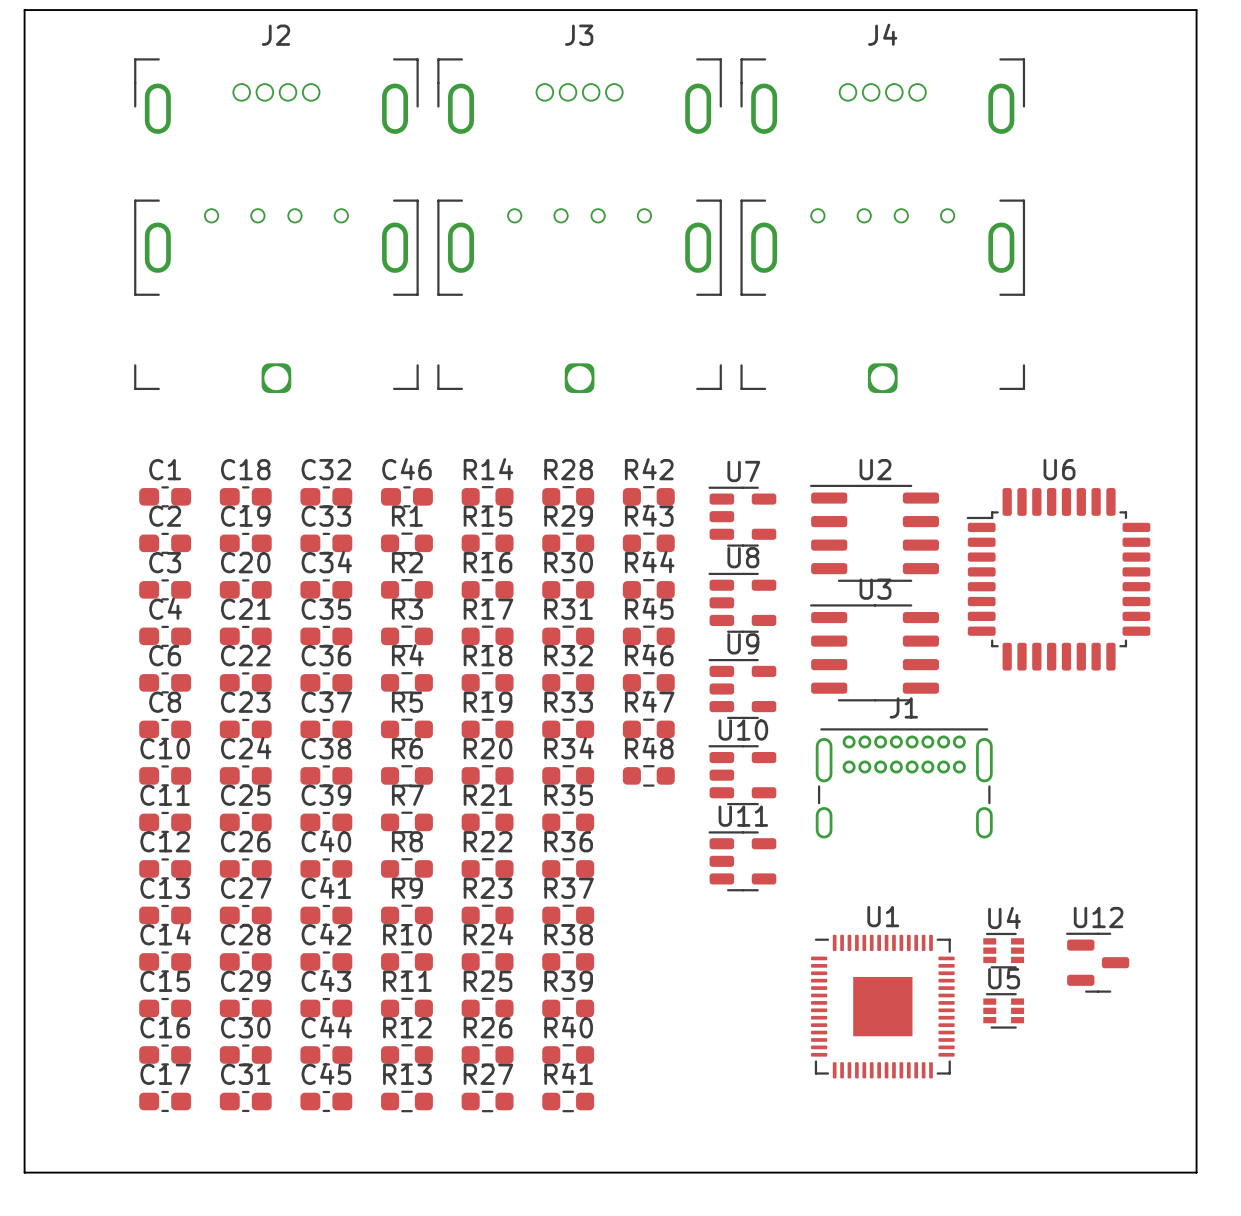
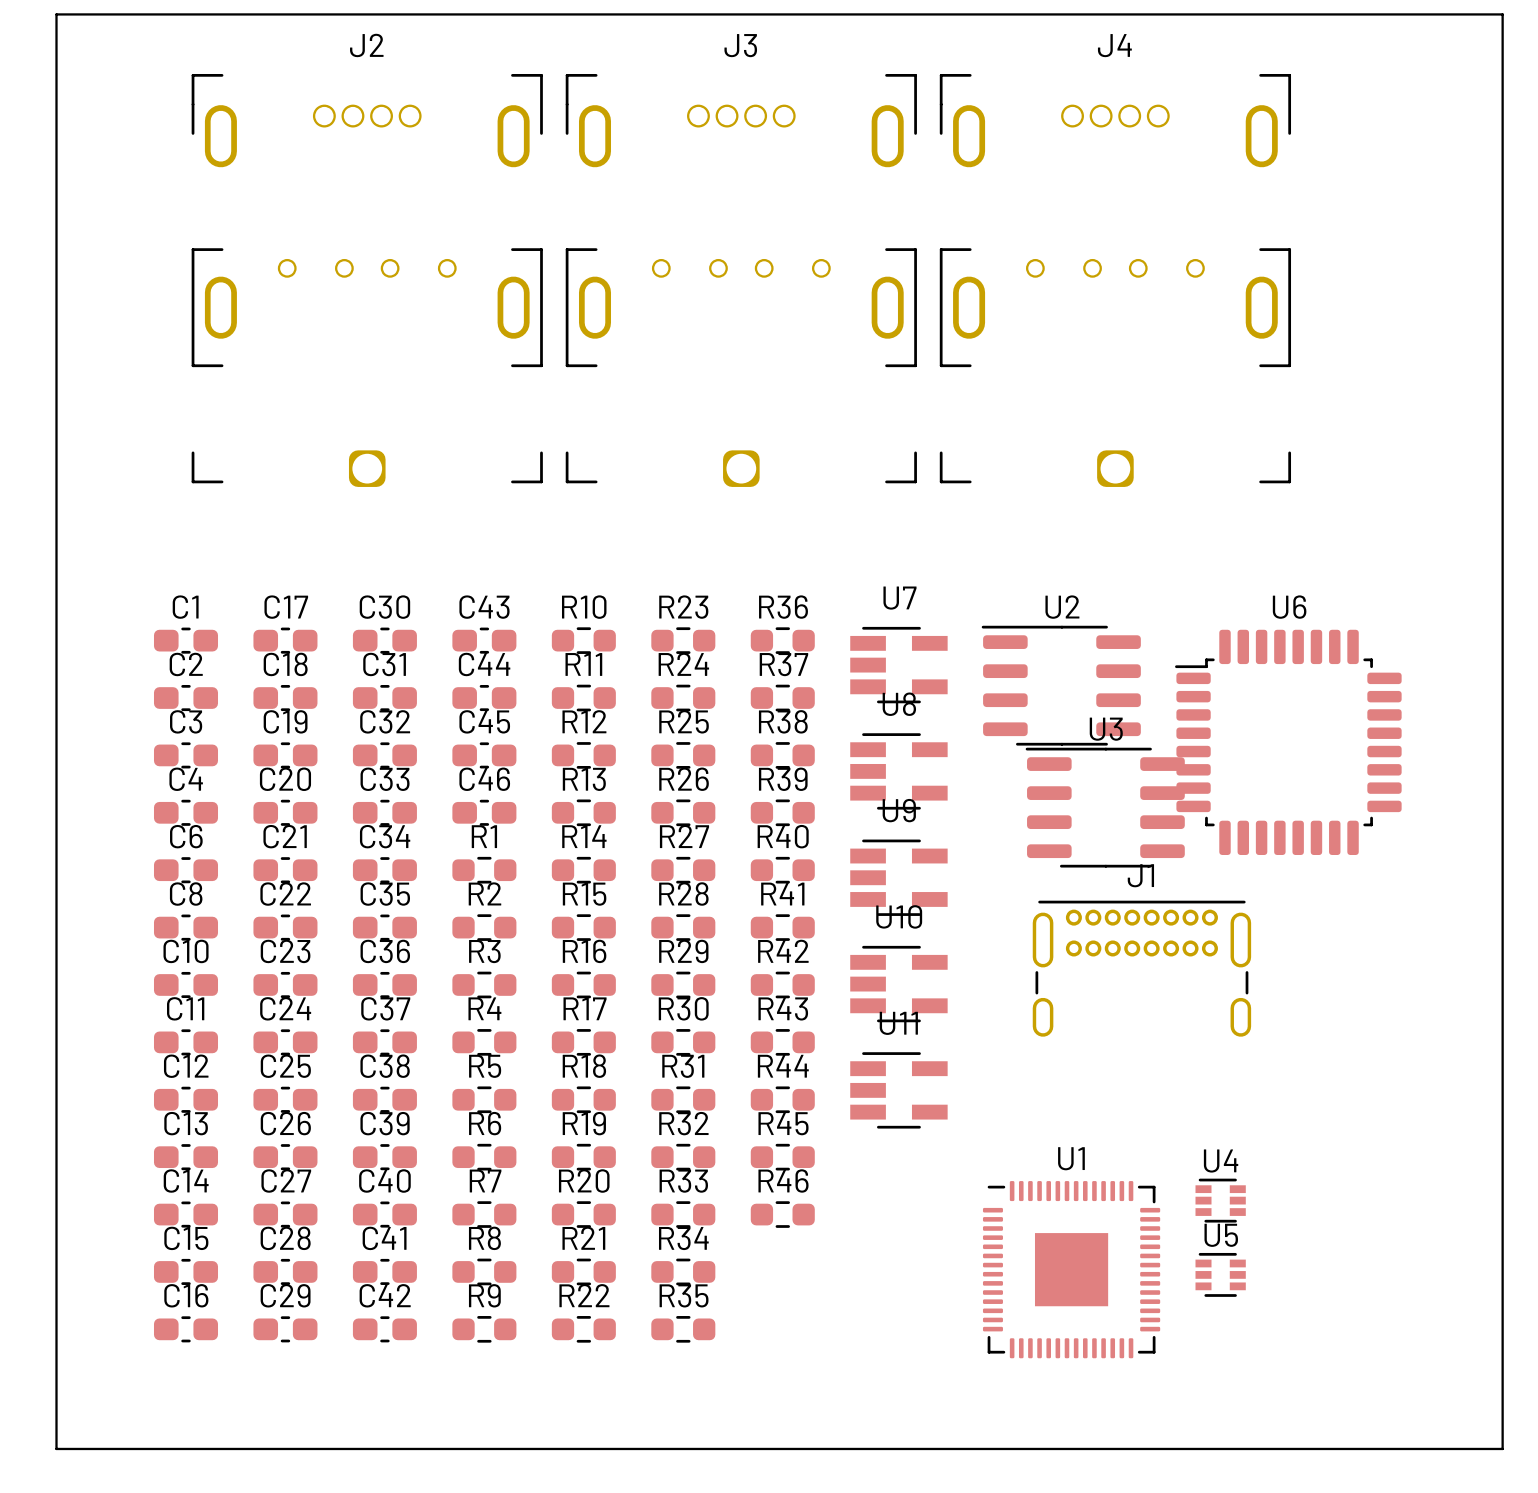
U7 footprint: [708, 486, 777, 547] -> [850, 626, 948, 704]
C1 position: (165, 496) -> (185, 640)
C18 position: (245, 496) -> (285, 698)
C32 position: (326, 496) -> (384, 755)
C46 position: (406, 496) -> (484, 812)
R14 position: (487, 496) -> (583, 870)
R28 position: (568, 496) -> (683, 927)
R42 position: (648, 496) -> (782, 984)
U2 position: (874, 533) -> (1061, 685)
C2 position: (165, 543) -> (185, 698)
C19 position: (245, 543) -> (285, 755)
C33 position: (326, 543) -> (384, 812)
R1 position: (406, 543) -> (484, 870)
R15 position: (487, 543) -> (583, 927)
R29 position: (568, 543) -> (683, 984)
R43 position: (648, 543) -> (782, 1042)
U8 footprint: [708, 572, 777, 633] -> [850, 733, 948, 810]
U6 position: (1058, 579) -> (1288, 742)
C3 position: (165, 589) -> (185, 755)
C20 position: (245, 589) -> (285, 812)
C34 position: (326, 589) -> (384, 870)
R2 position: (406, 589) -> (484, 927)
R16 position: (487, 589) -> (583, 984)
R30 position: (568, 589) -> (683, 1042)
R44 position: (648, 589) -> (782, 1099)
C4 position: (165, 636) -> (185, 812)
C21 position: (245, 636) -> (285, 870)
C35 position: (326, 636) -> (384, 927)
R3 position: (406, 636) -> (484, 984)
R17 position: (487, 636) -> (583, 1042)
R31 position: (568, 636) -> (683, 1099)
R45 position: (648, 636) -> (782, 1157)
U9 footprint: [708, 658, 777, 720] -> [850, 839, 948, 916]
C6 position: (165, 682) -> (185, 870)
C22 position: (245, 682) -> (285, 927)
C36 position: (326, 682) -> (384, 984)
R4 position: (406, 682) -> (484, 1042)
R18 position: (487, 682) -> (583, 1099)
R32 position: (568, 682) -> (683, 1157)
R46 position: (648, 682) -> (782, 1214)
C8 position: (165, 729) -> (185, 927)
C23 position: (245, 729) -> (285, 984)
C37 position: (326, 729) -> (384, 1042)
R5 position: (406, 729) -> (484, 1099)
R19 position: (487, 729) -> (583, 1157)
R33 position: (568, 729) -> (683, 1214)
R47: (648, 729) -> none
U10 footprint: [708, 745, 777, 806] -> [850, 945, 948, 1023]
C10 position: (165, 775) -> (185, 984)
C24 position: (245, 775) -> (285, 1042)
C38 position: (326, 775) -> (384, 1099)
R6 position: (406, 775) -> (484, 1157)
R20 position: (487, 775) -> (583, 1214)
R34 position: (568, 775) -> (683, 1271)
R48: (648, 775) -> none
C11 position: (165, 822) -> (185, 1042)
C25 position: (245, 822) -> (285, 1099)
C39 position: (326, 822) -> (384, 1157)
R7 position: (406, 822) -> (484, 1214)
R21 position: (487, 822) -> (583, 1271)
R35 position: (568, 822) -> (683, 1329)
U11 footprint: [708, 831, 777, 892] -> [850, 1052, 948, 1129]
C12 position: (165, 868) -> (185, 1099)
C26 position: (245, 868) -> (285, 1157)
C40 position: (326, 868) -> (384, 1214)
R8 position: (406, 868) -> (484, 1271)
R22 position: (487, 868) -> (583, 1329)
R36 position: (568, 868) -> (782, 640)
C13 position: (165, 915) -> (185, 1157)
C27 position: (245, 915) -> (285, 1214)
C41 position: (326, 915) -> (384, 1271)
R9 position: (406, 915) -> (484, 1329)
R23 position: (487, 915) -> (683, 640)
R37 position: (568, 915) -> (782, 698)
U4 position: (1003, 950) -> (1220, 1200)
C14 position: (165, 961) -> (185, 1214)
C28 position: (245, 961) -> (285, 1271)
C42 position: (326, 961) -> (384, 1329)
R10 position: (406, 961) -> (583, 640)
R24 position: (487, 961) -> (683, 698)
R38 position: (568, 961) -> (782, 755)
U12: (1097, 962) -> none
U1 position: (882, 1006) -> (1071, 1269)
C15 position: (165, 1008) -> (185, 1271)
C29 position: (245, 1008) -> (285, 1329)
C43 position: (326, 1008) -> (484, 640)
R11 position: (406, 1008) -> (583, 698)
R25 position: (487, 1008) -> (683, 755)
R39 position: (568, 1008) -> (782, 812)
U5 position: (1003, 1010) -> (1220, 1274)
C16 position: (165, 1054) -> (185, 1329)
C30 position: (245, 1054) -> (384, 640)
C44 position: (326, 1054) -> (484, 698)
R12 position: (406, 1054) -> (583, 755)
R26 position: (487, 1054) -> (683, 812)
R40 position: (568, 1054) -> (782, 870)
C17 position: (165, 1101) -> (285, 640)
C31 position: (245, 1101) -> (384, 698)
C45 position: (326, 1101) -> (484, 755)
R13 position: (406, 1101) -> (583, 812)
R27 position: (487, 1101) -> (683, 870)
R41 position: (568, 1101) -> (782, 927)

